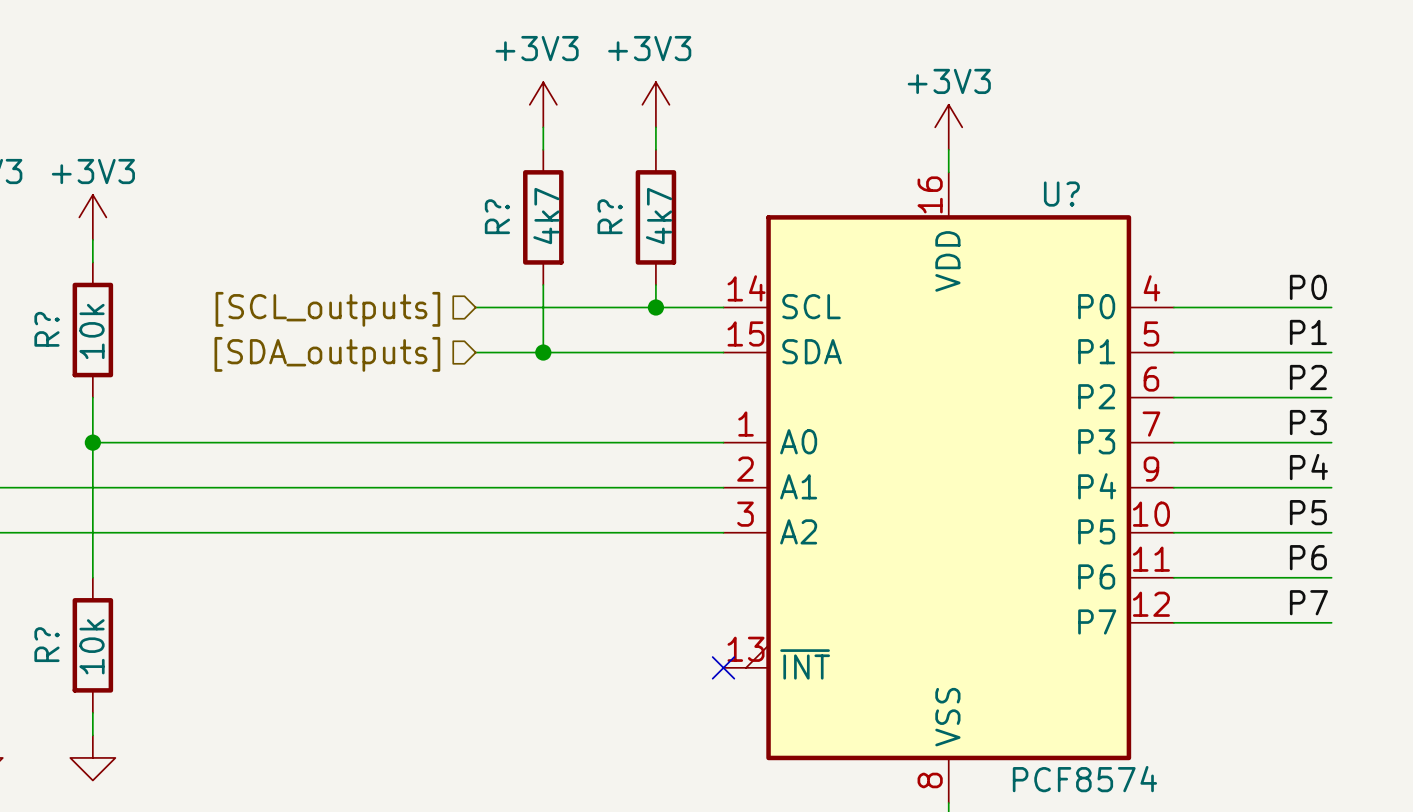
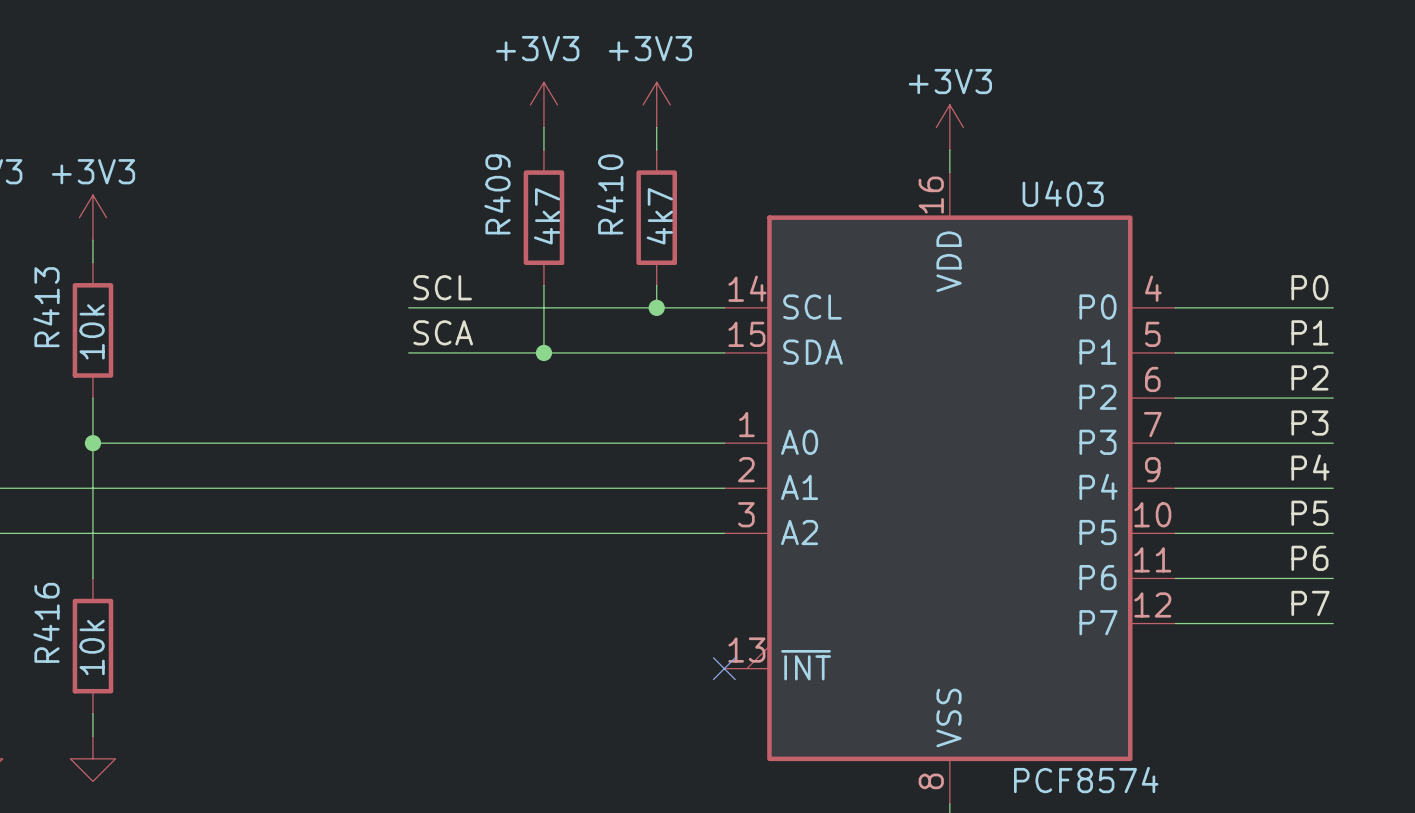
U? name: U? (1061, 194) -> U403 (1063, 193)
R? name: R? (497, 216) -> R409 (497, 194)
R? name: R? (610, 216) -> R410 (610, 194)
label: none -> SCL (442, 287)
wire: none -> (408, 307) (476, 307)
hierarchical label: [SCL_outputs] (327, 309) -> none
R? name: R? (46, 329) -> R413 (46, 307)
label: none -> SCA (443, 332)
wire: none -> (408, 352) (476, 352)
hierarchical label: [SDA_outputs] (327, 354) -> none
R? name: R? (46, 644) -> R416 (46, 622)

